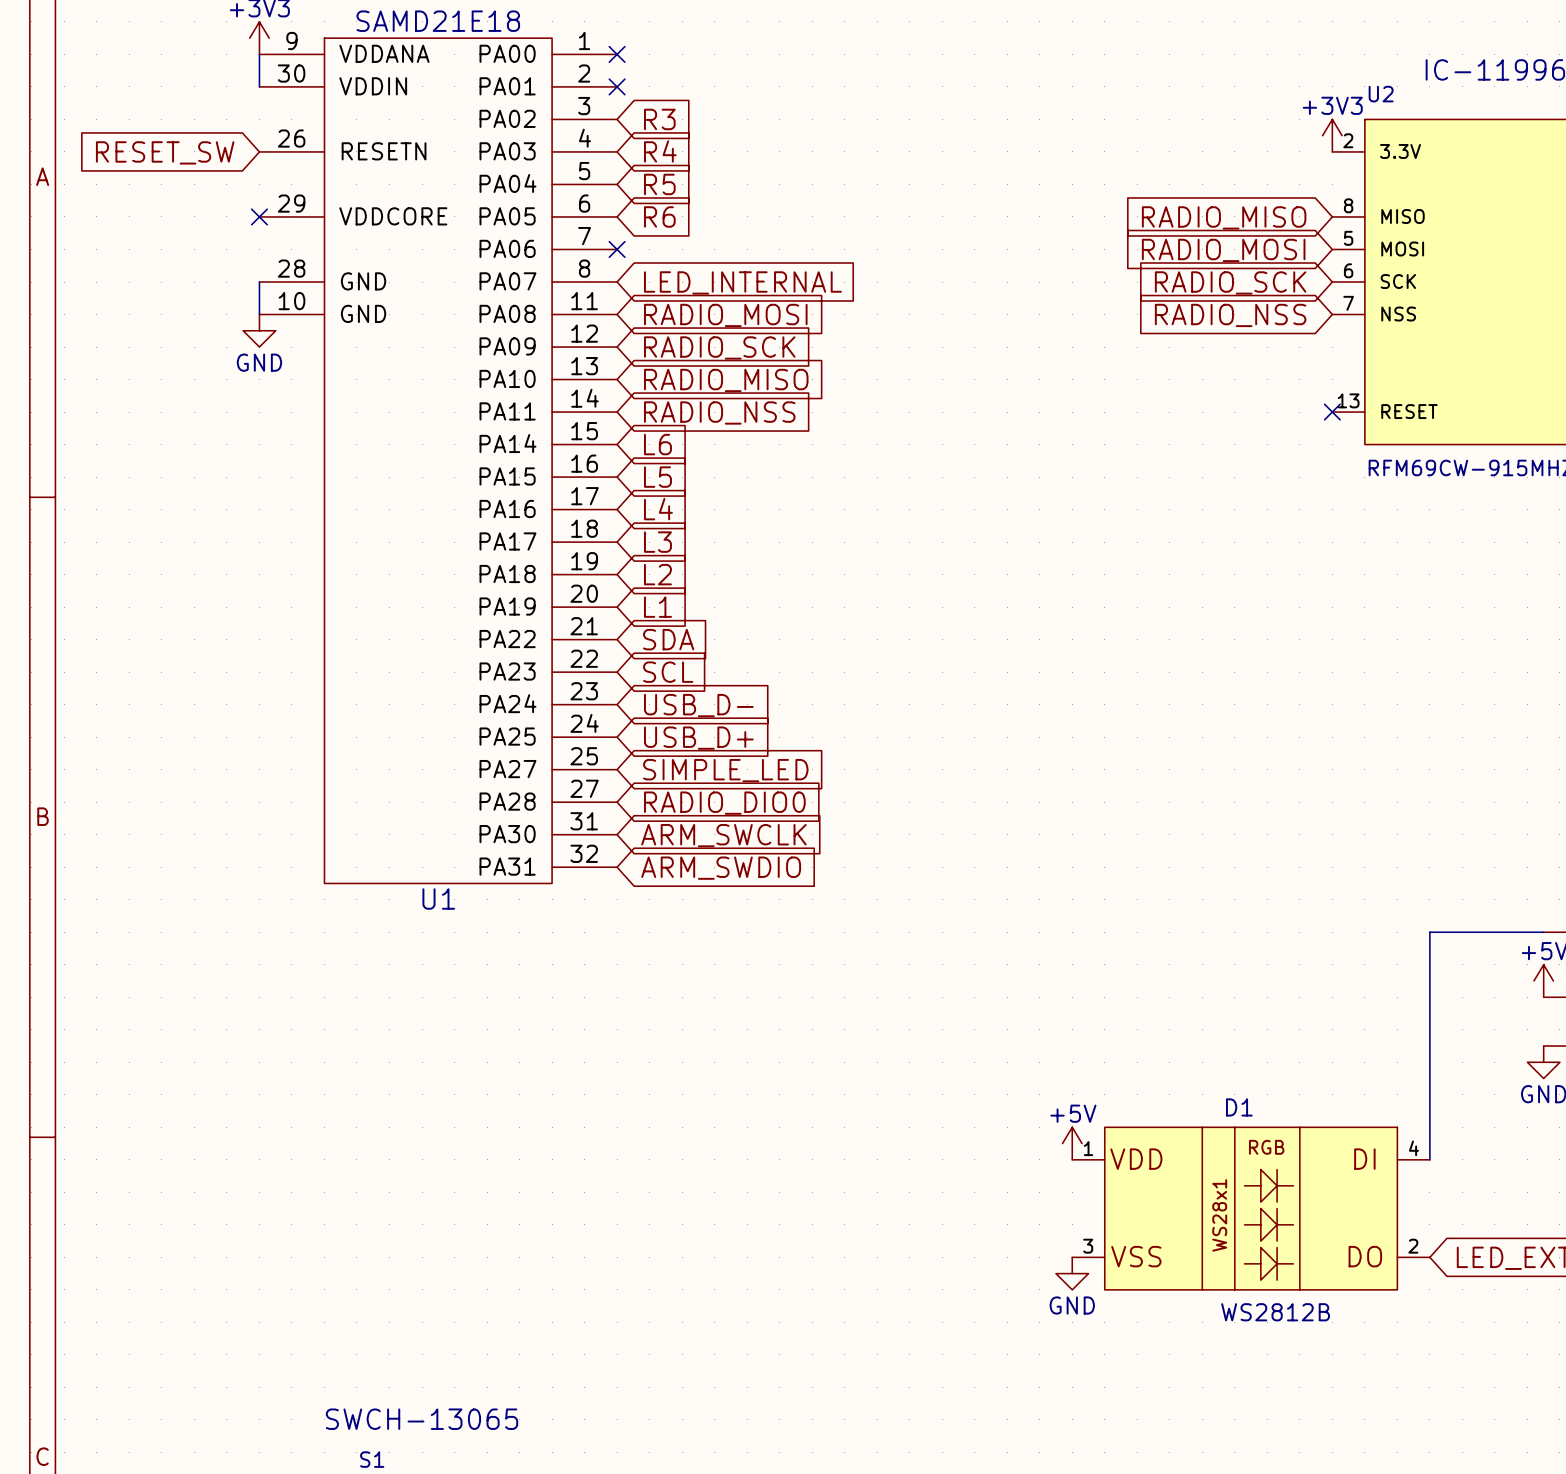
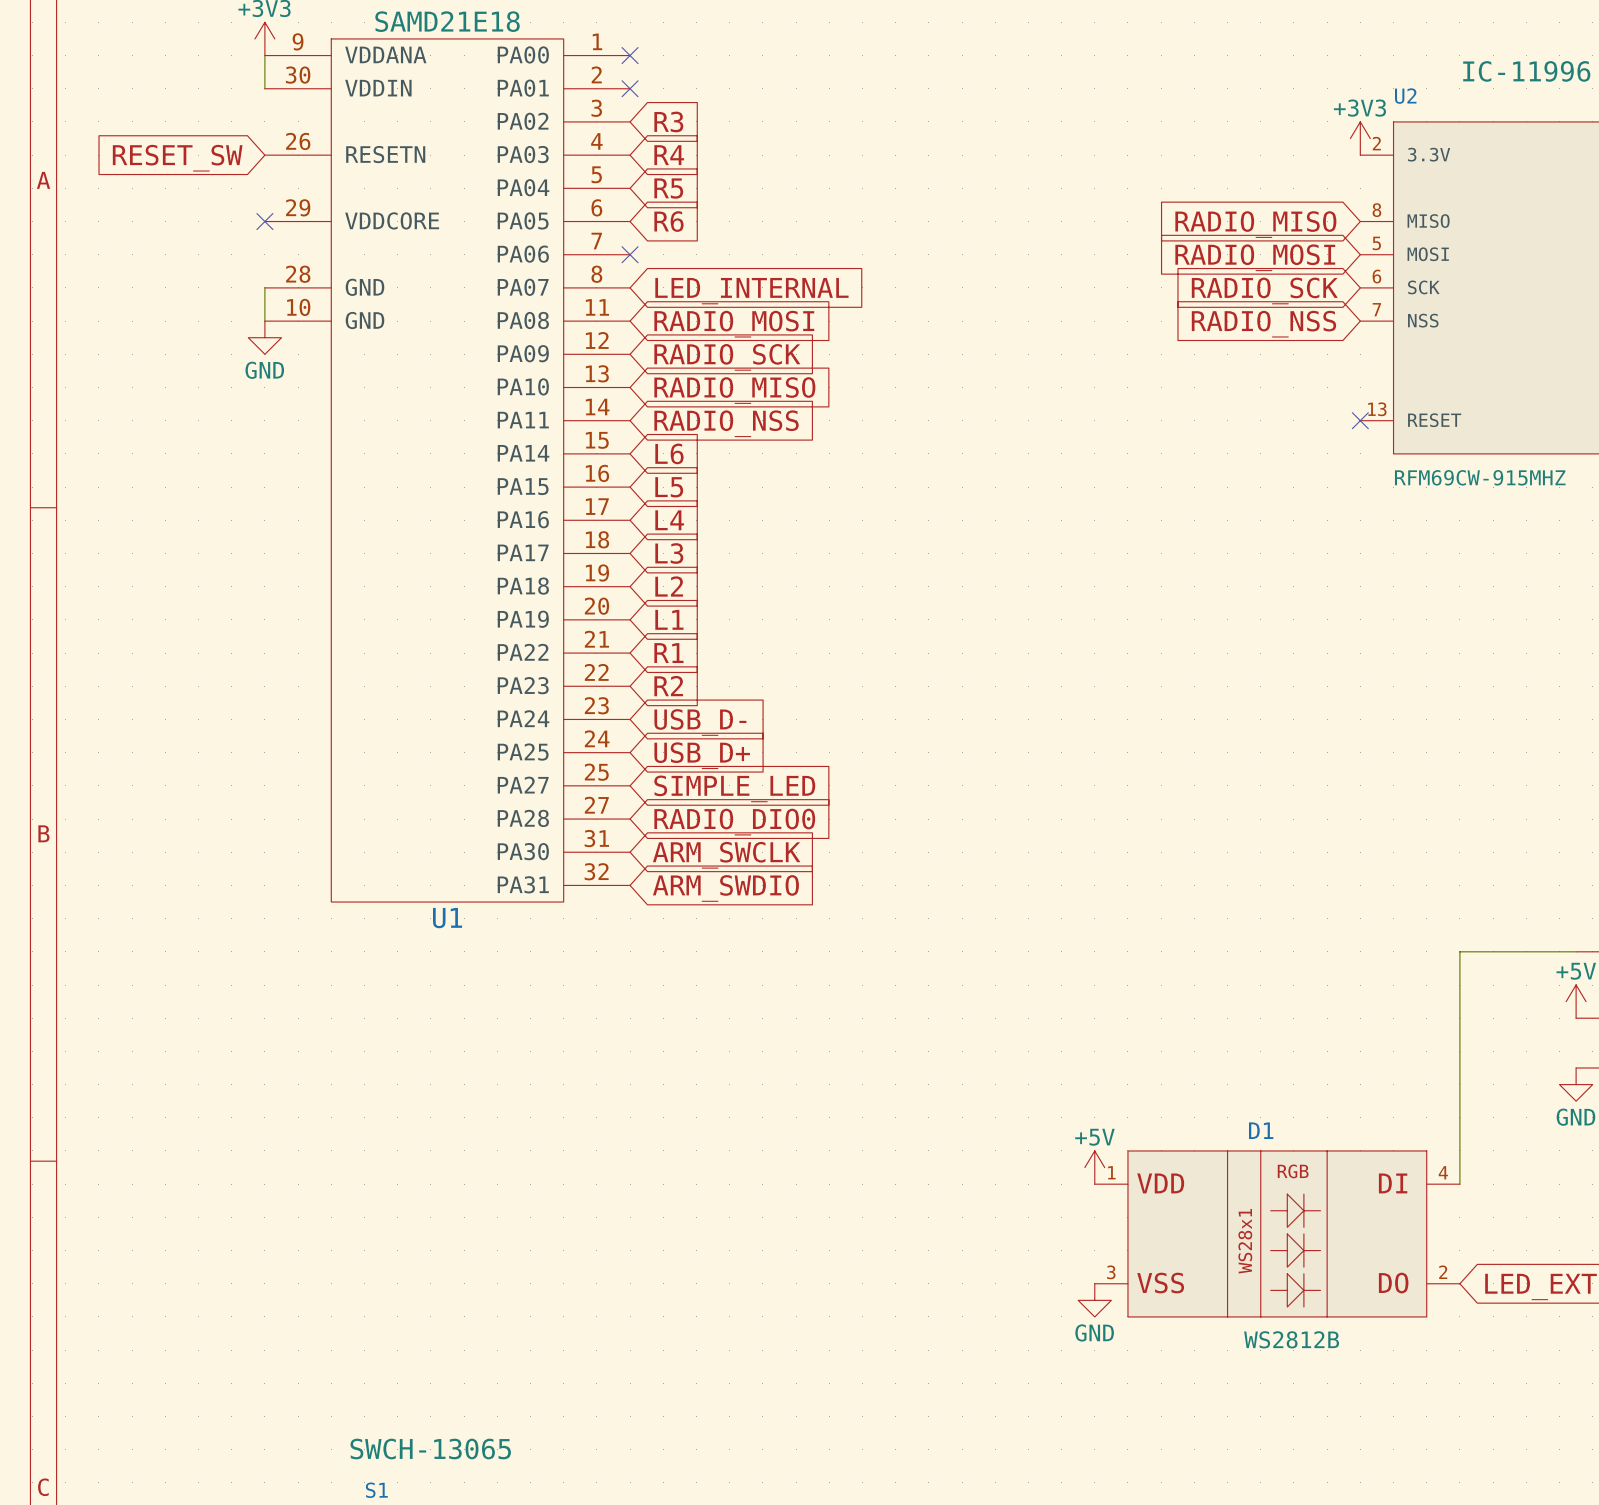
global label: SDA (668, 639) -> R1 (668, 653)
global label: SCL (668, 672) -> R2 (668, 686)

